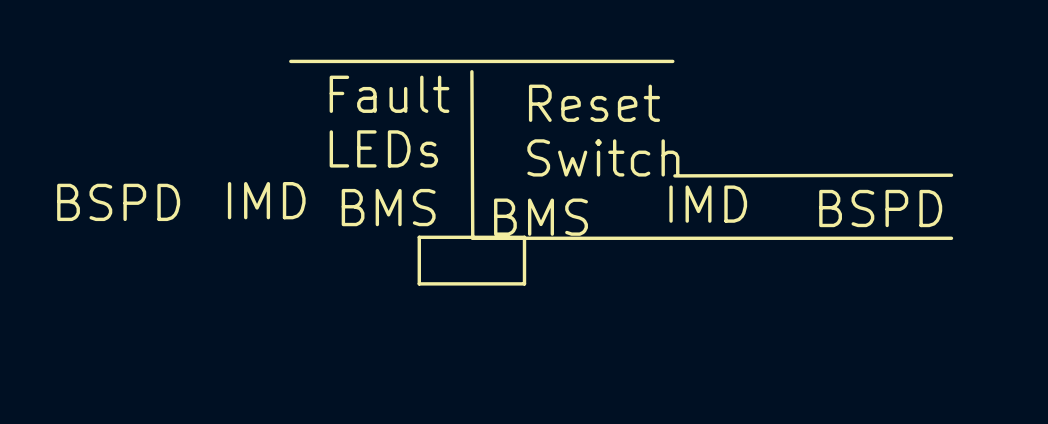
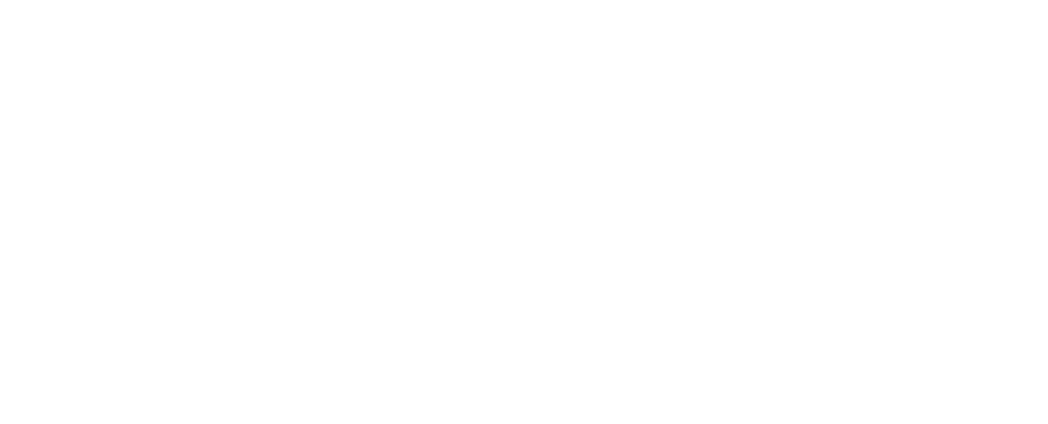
line: (290, 61) (672, 61) -> none
line: (471, 71) (472, 238) (951, 238) -> none
text: Fault (389, 94) -> none
text: Reset (594, 103) -> none
text: LEDs (383, 148) -> none
text: Switch (603, 157) -> none
line: (951, 175) (674, 175) -> none
text: IMD (266, 200) -> none
text: BSPD (118, 202) -> none
text: IMD (708, 204) -> none
text: BMS (388, 207) -> none
text: BSPD (880, 208) -> none
text: BMS (540, 217) -> none
line: (419, 237) (524, 237) (524, 283) (419, 283) (419, 237) -> none

